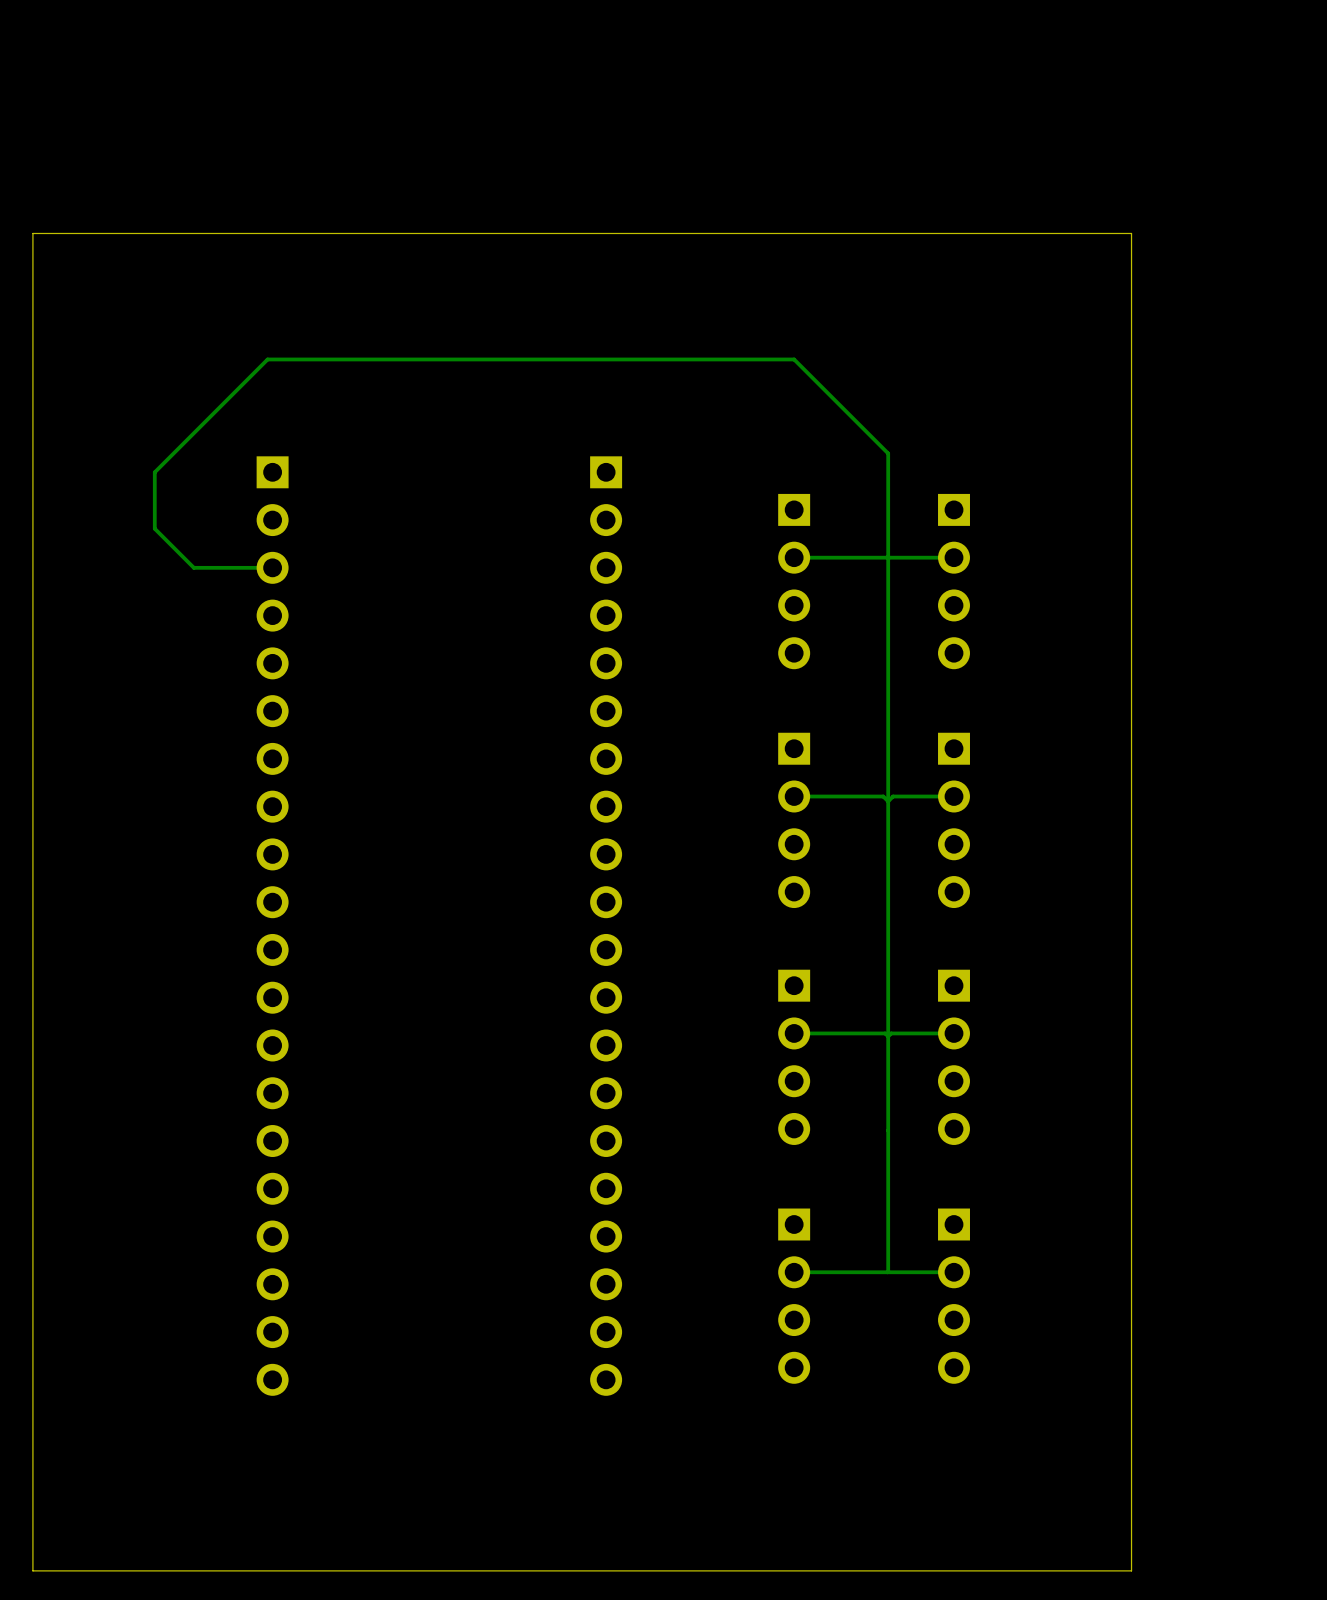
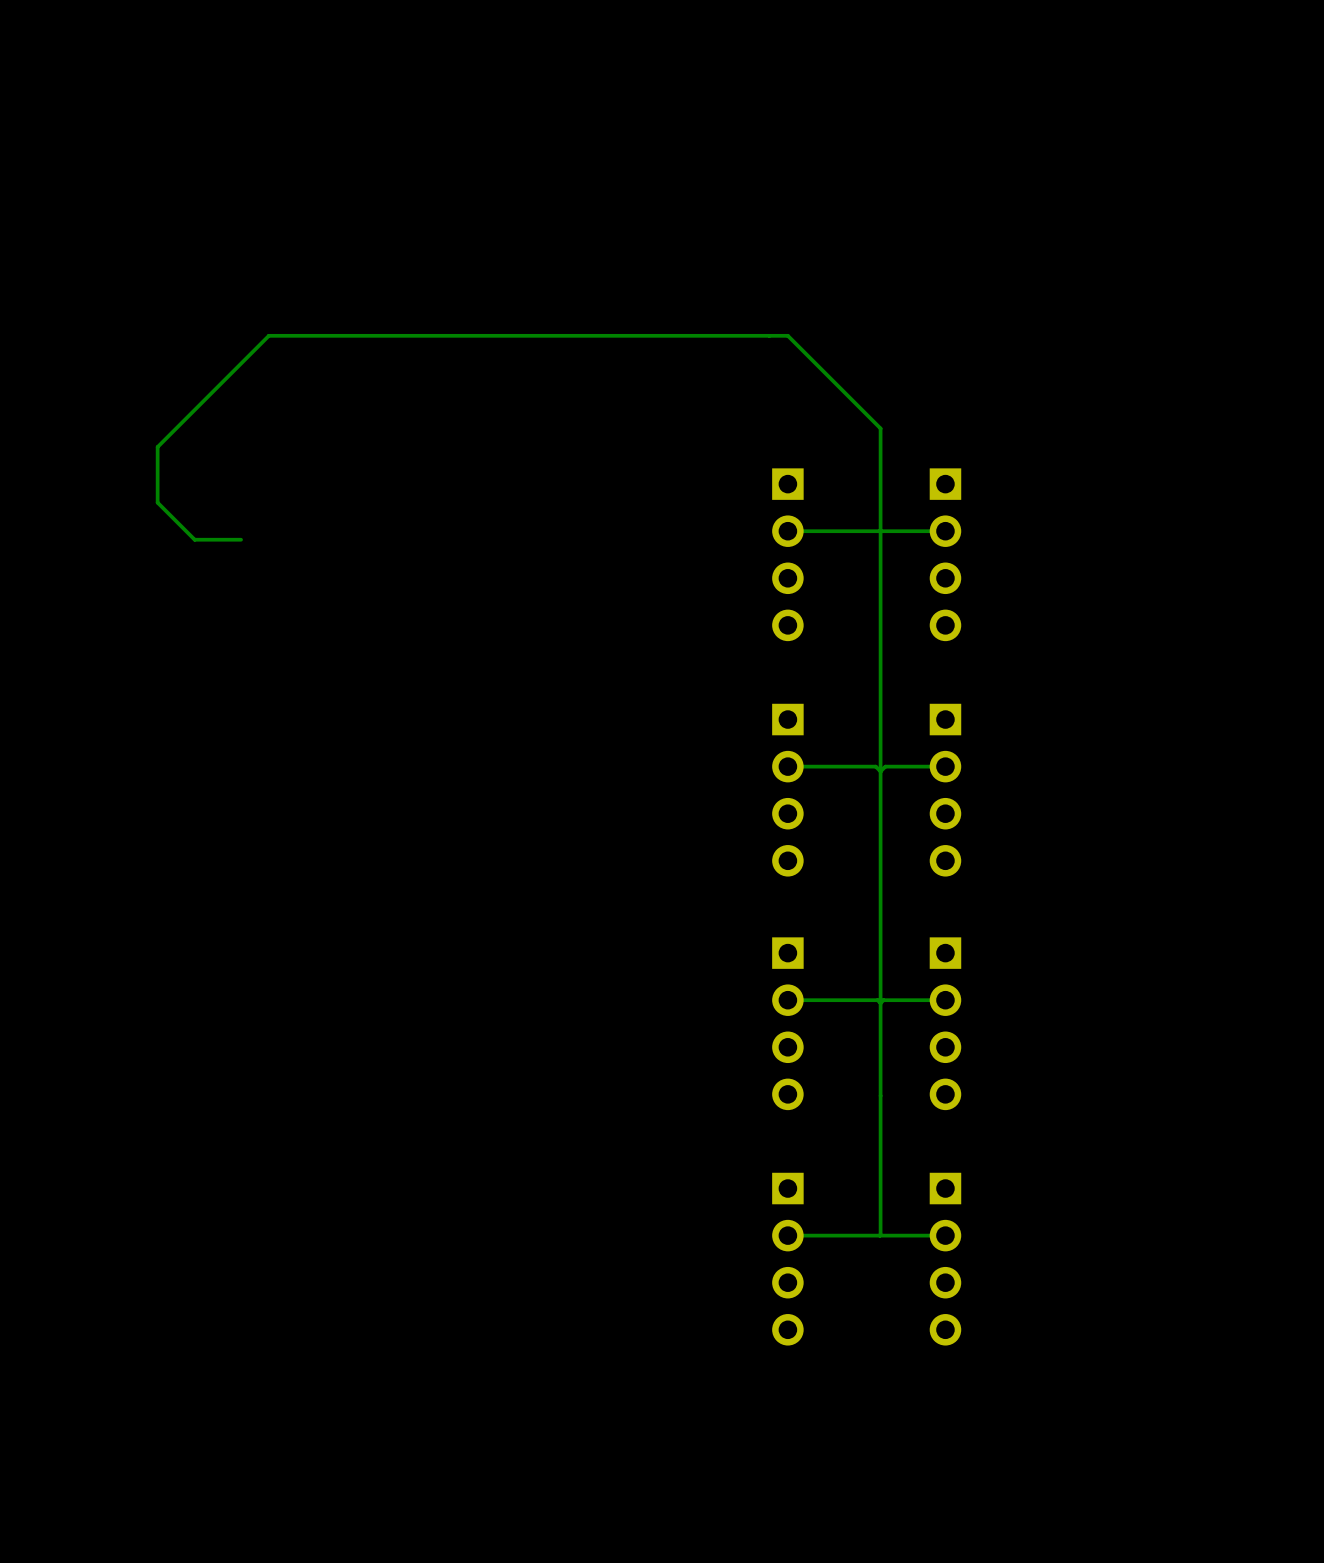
board edge: (1131, 233) (32, 233) (32, 1570) (1131, 1570) (1131, 233) -> none
track: (192, 566) (272, 567) -> (194, 539) (241, 539)
part: (272, 926) -> none
part: (606, 926) -> none

